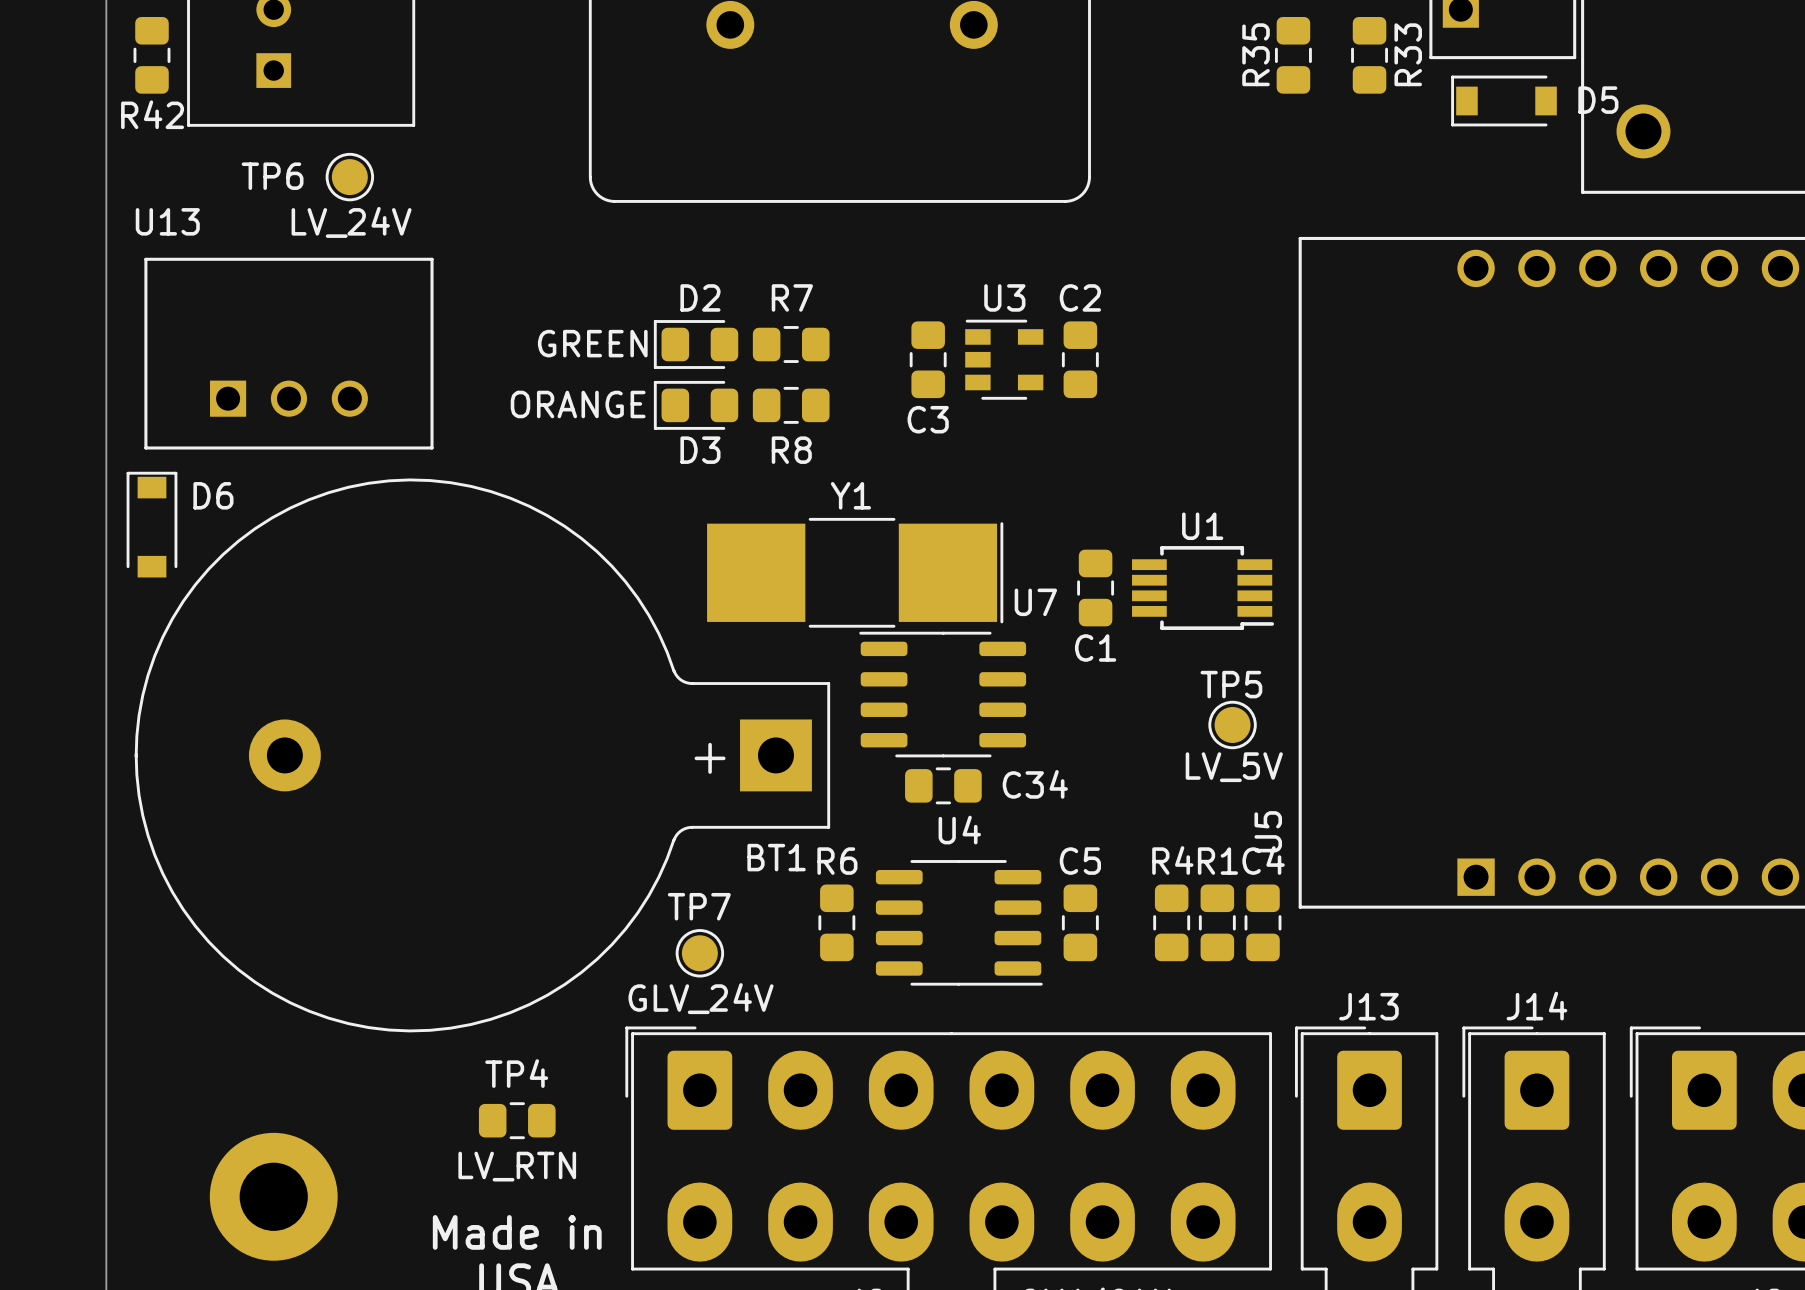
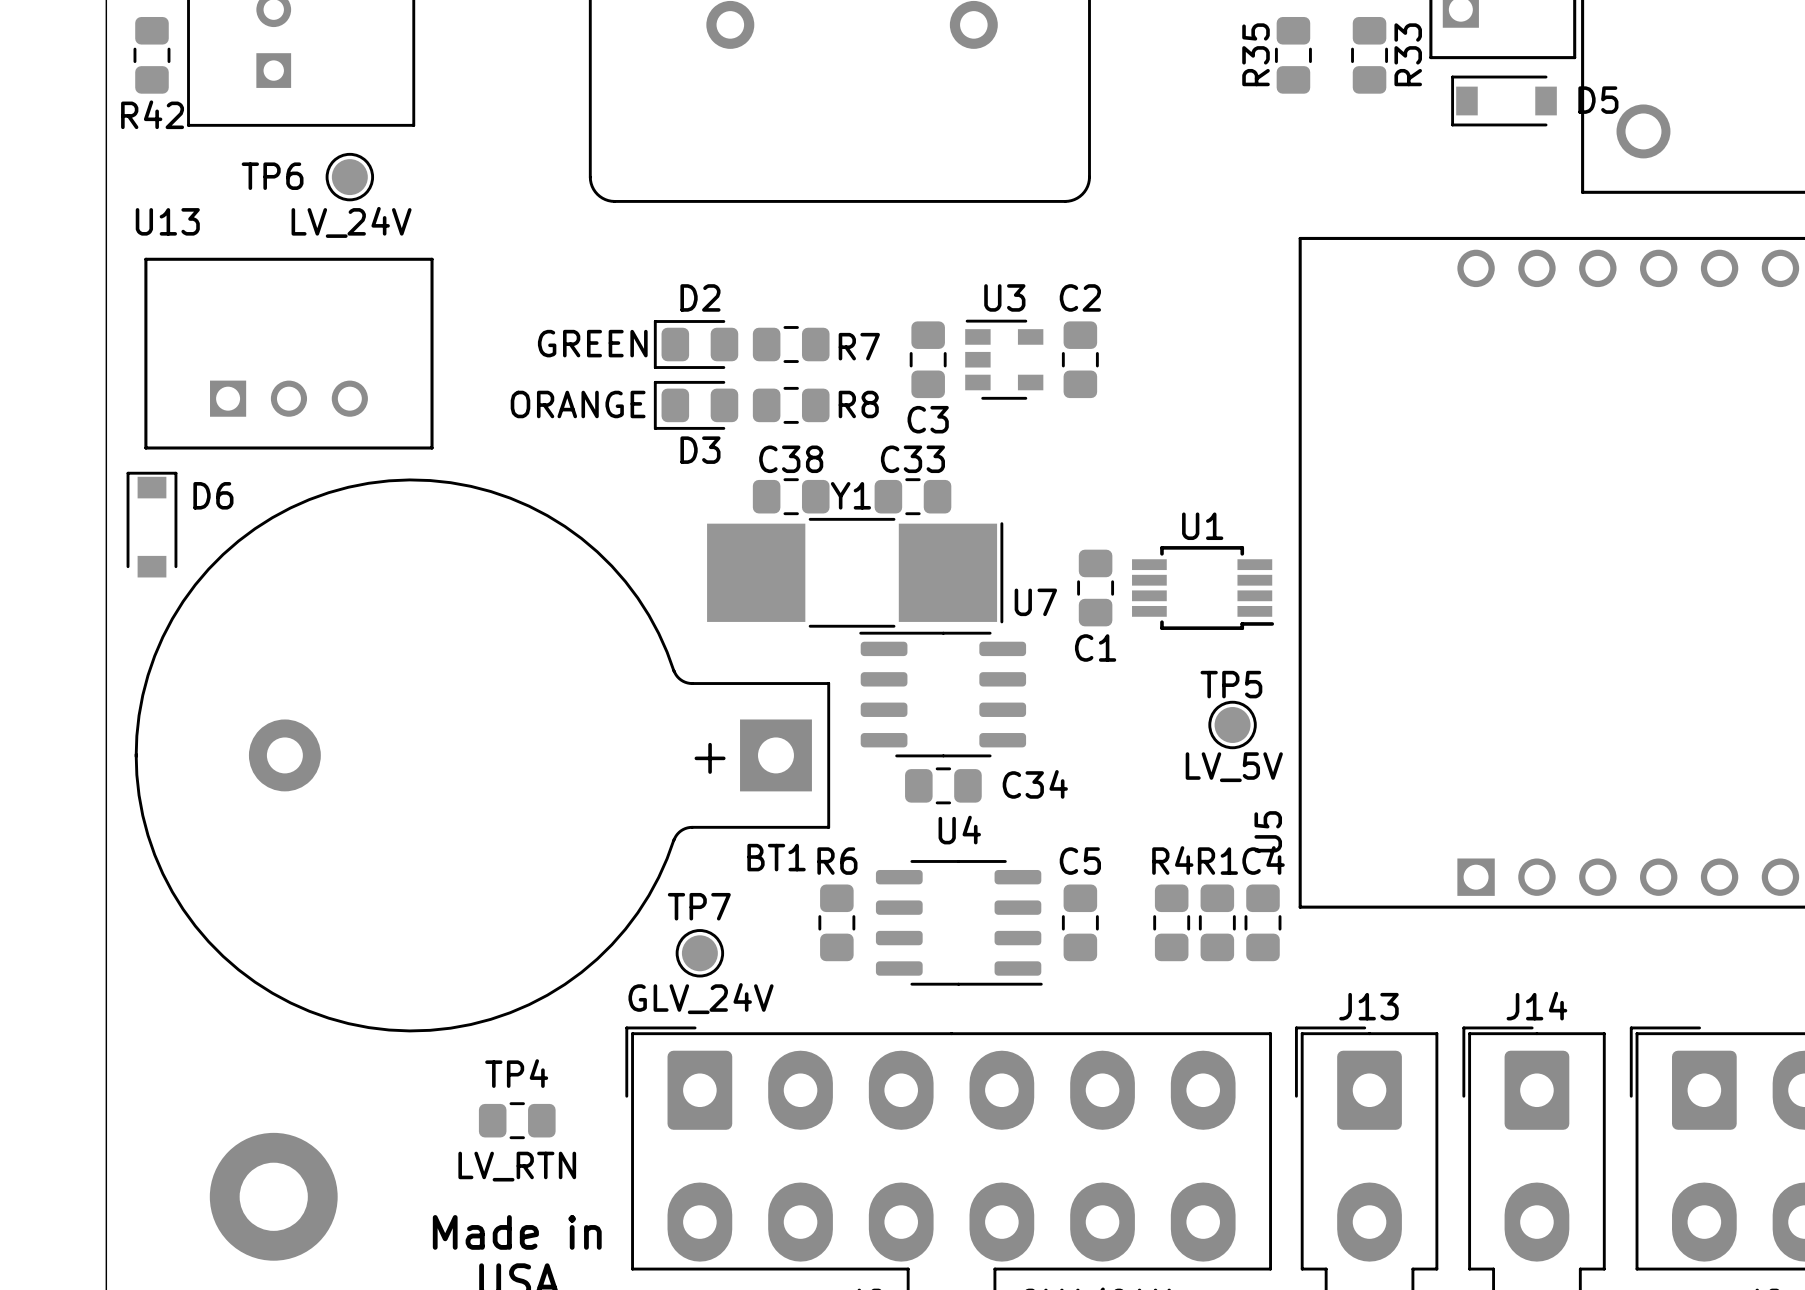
R7 name position: R7 (792, 297) -> R7 (859, 346)
R8 name position: R8 (791, 450) -> R8 (858, 404)
C38: none -> (791, 496)
C33: none -> (912, 496)

